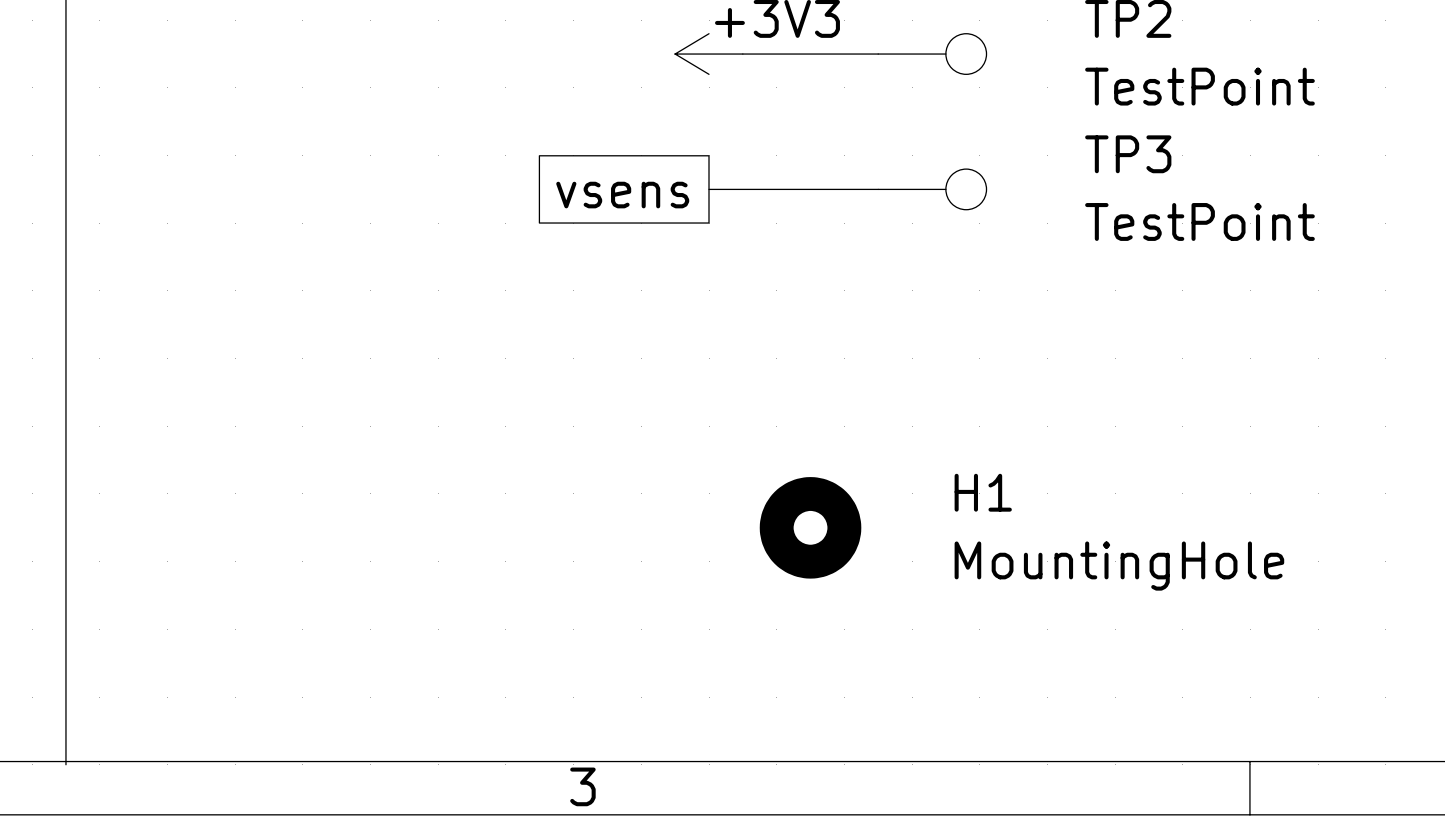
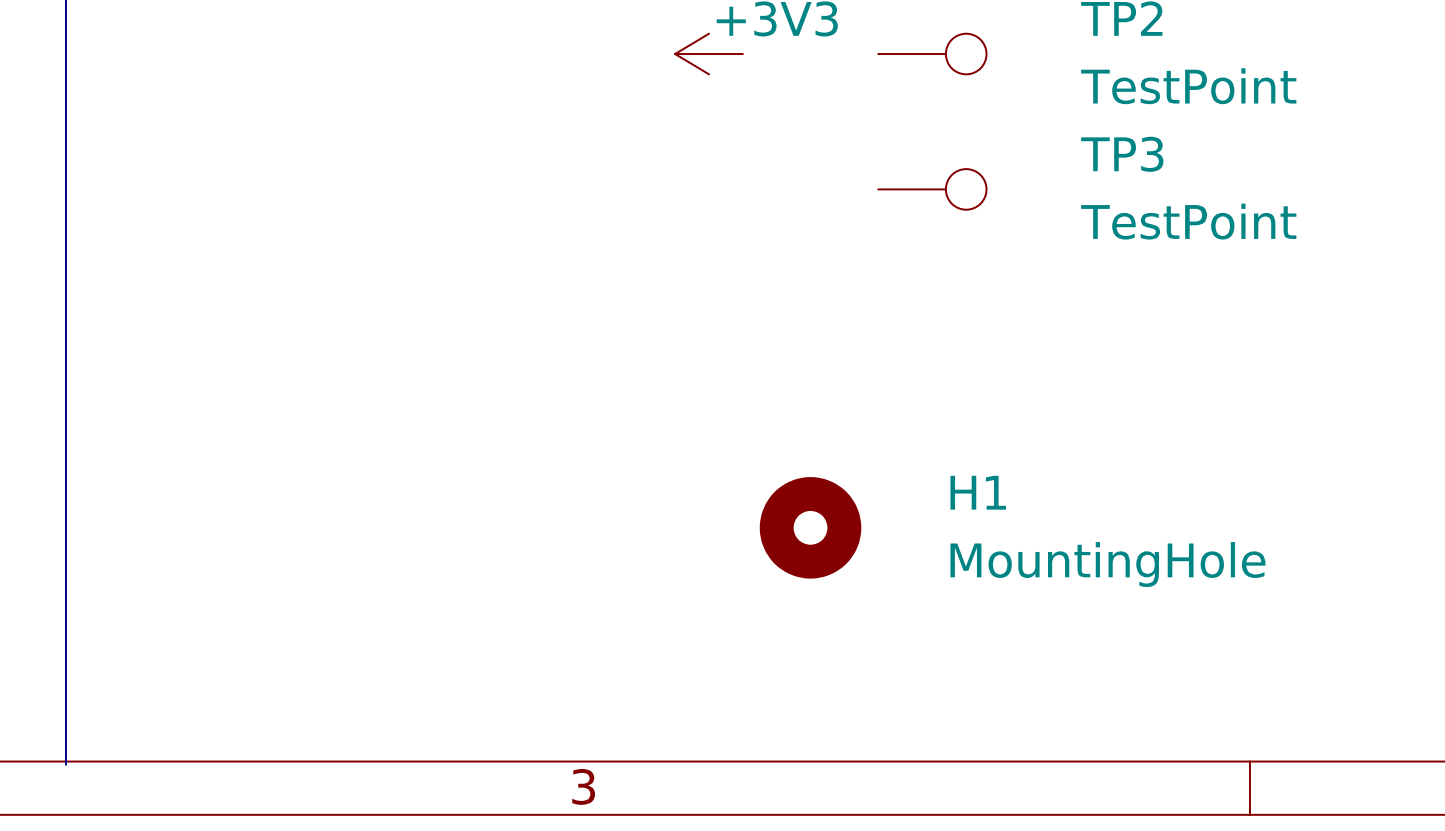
wire: (742, 54) (878, 54) -> none
wire: (709, 189) (878, 189) -> none
global label: vsens (622, 195) -> none

